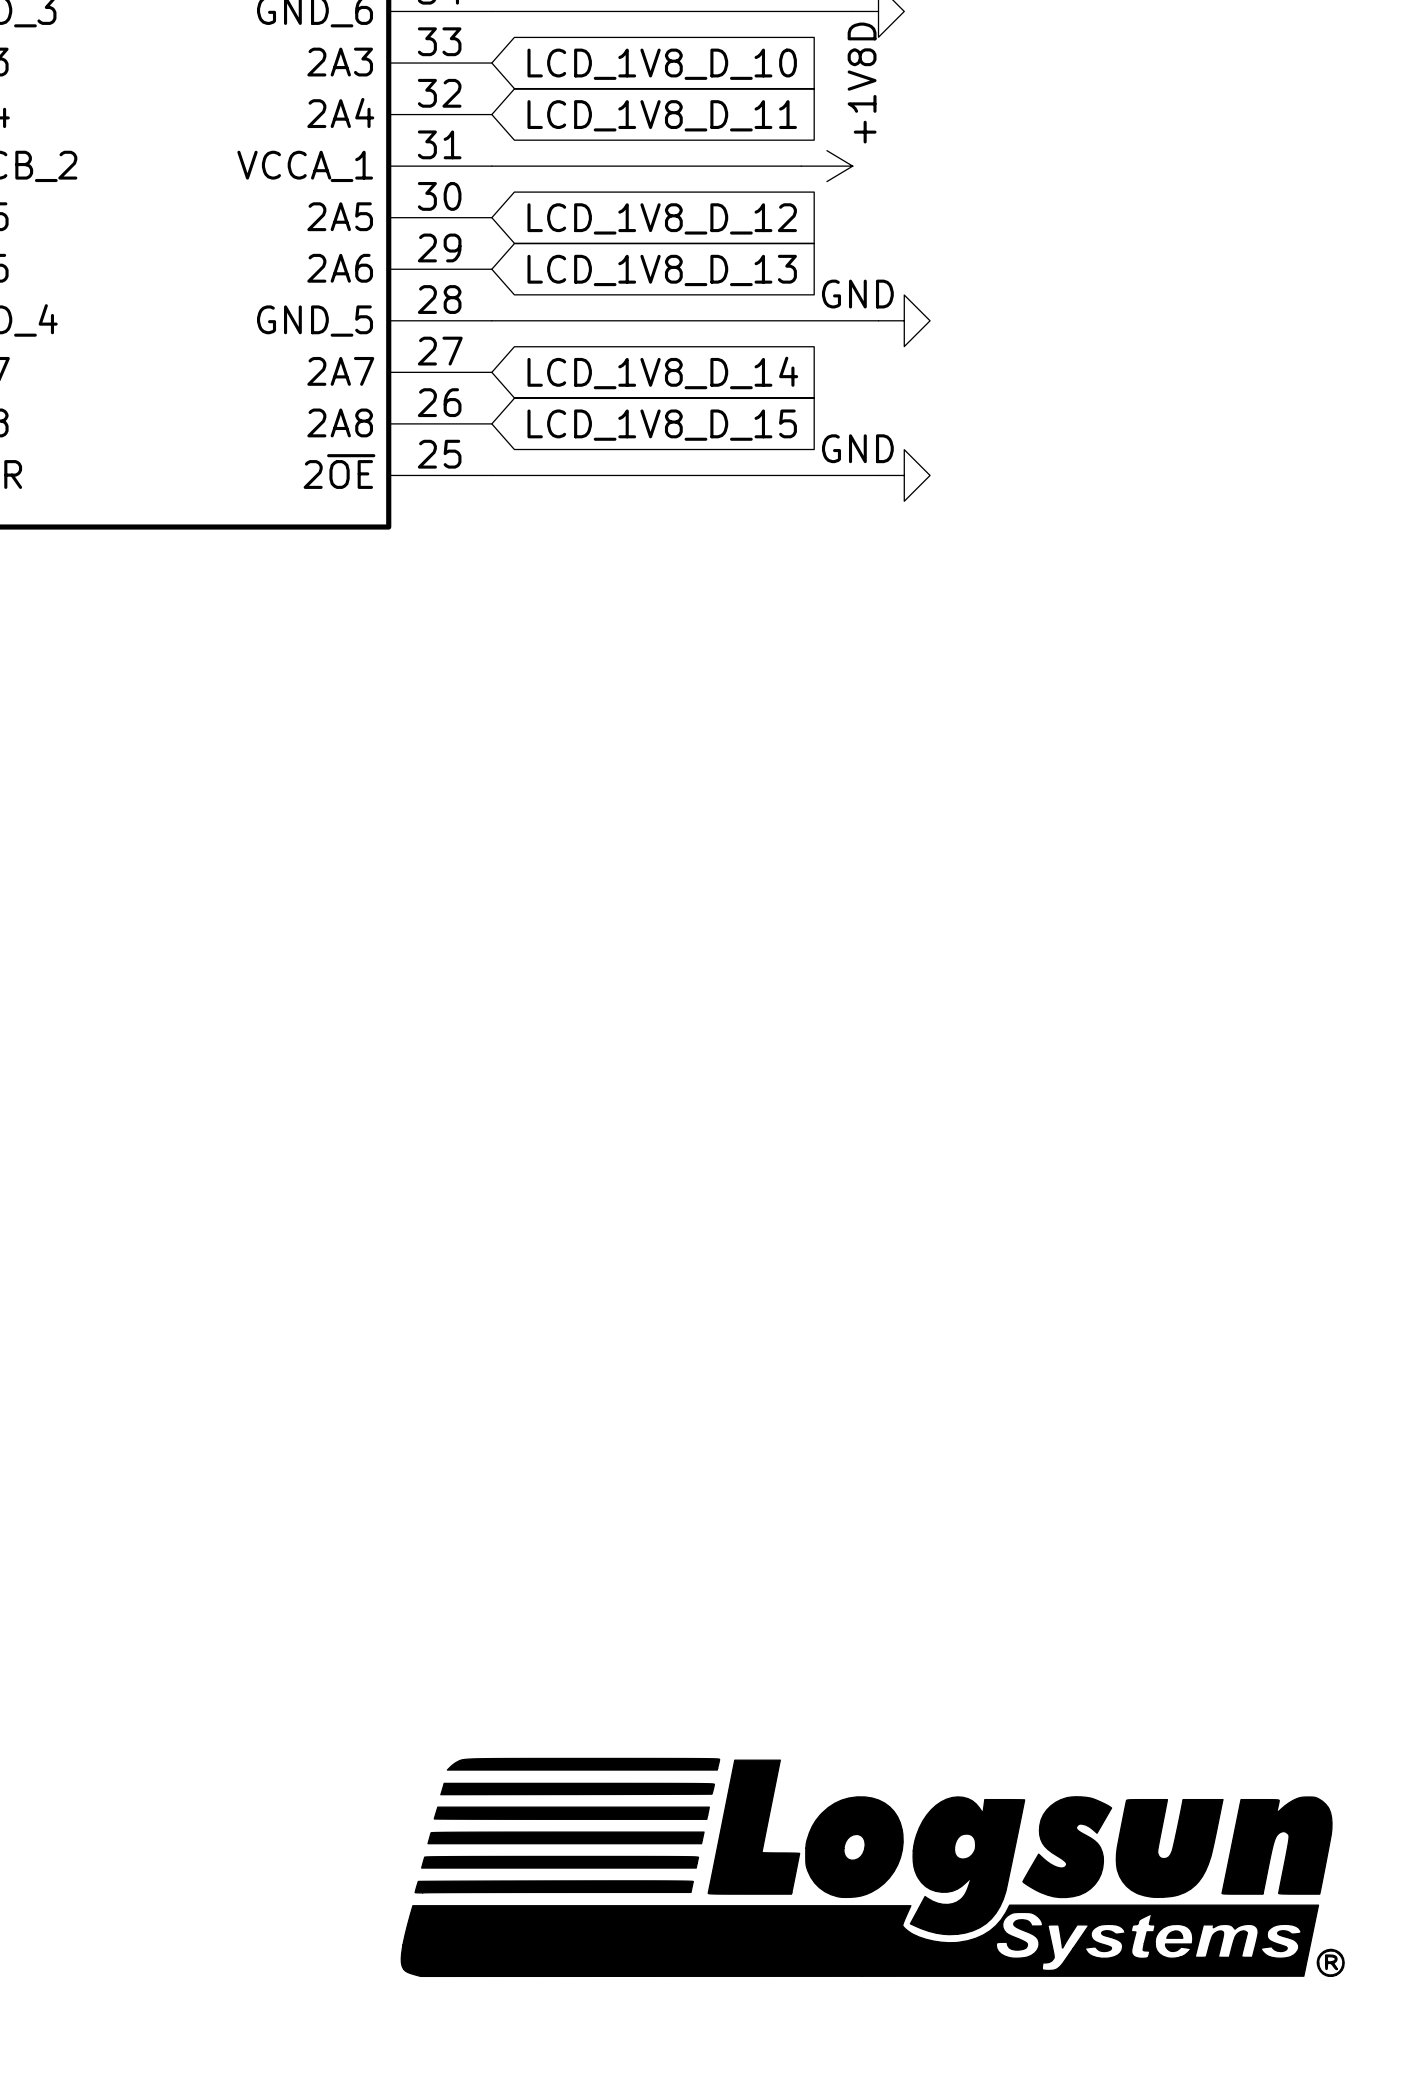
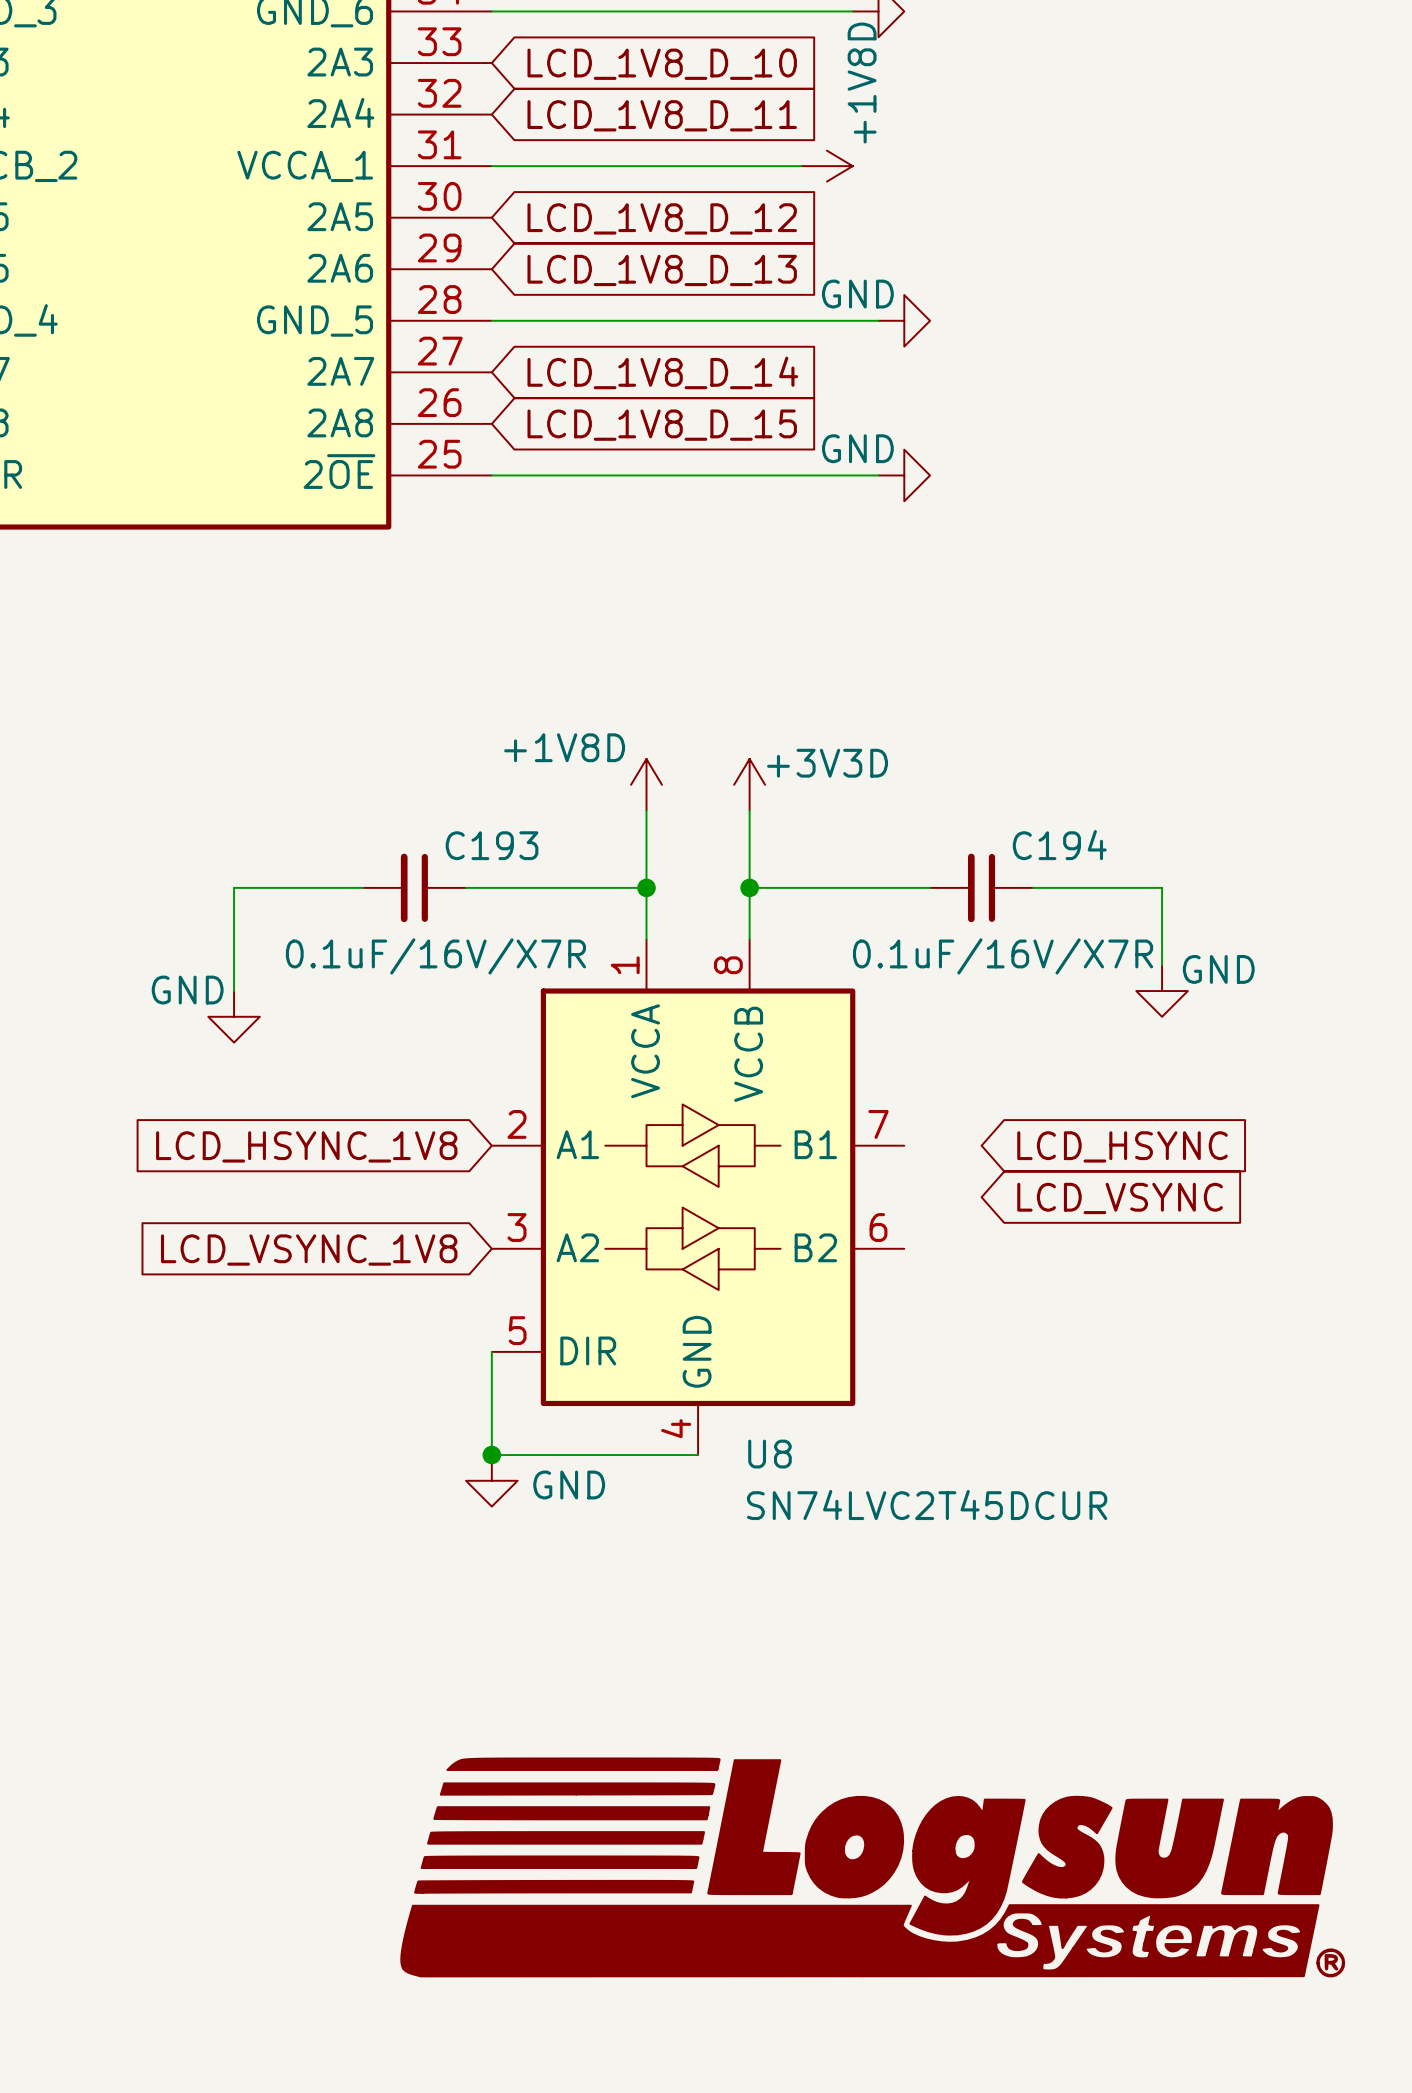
power symbol: none -> +1V8D (646, 784)
power symbol: none -> +3V3D (749, 784)
wire: none -> (646, 810) (646, 939)
wire: none -> (749, 810) (749, 939)
wire: none -> (362, 887) (234, 887) (234, 991)
C193: none -> 0.1uF/16V/X7R (414, 887)
wire: none -> (466, 887) (646, 887)
junction: none -> (646, 887)
wire: none -> (749, 887) (930, 887)
junction: none -> (749, 887)
C194: none -> 0.1uF/16V/X7R (981, 887)
wire: none -> (1033, 887) (1162, 887) (1162, 965)
power symbol: none -> GND (1162, 991)
power symbol: none -> GND (234, 1016)
global label: none -> LCD_HSYNC_1V8 (306, 1146)
global label: none -> LCD_HSYNC (1122, 1146)
U8: none -> SN74LVC2T45DCUR (698, 1197)
global label: none -> LCD_VSYNC (1120, 1198)
global label: none -> LCD_VSYNC_1V8 (309, 1250)
wire: none -> (491, 1351) (491, 1455) (698, 1455)
junction: none -> (491, 1455)
power symbol: none -> GND (491, 1480)

